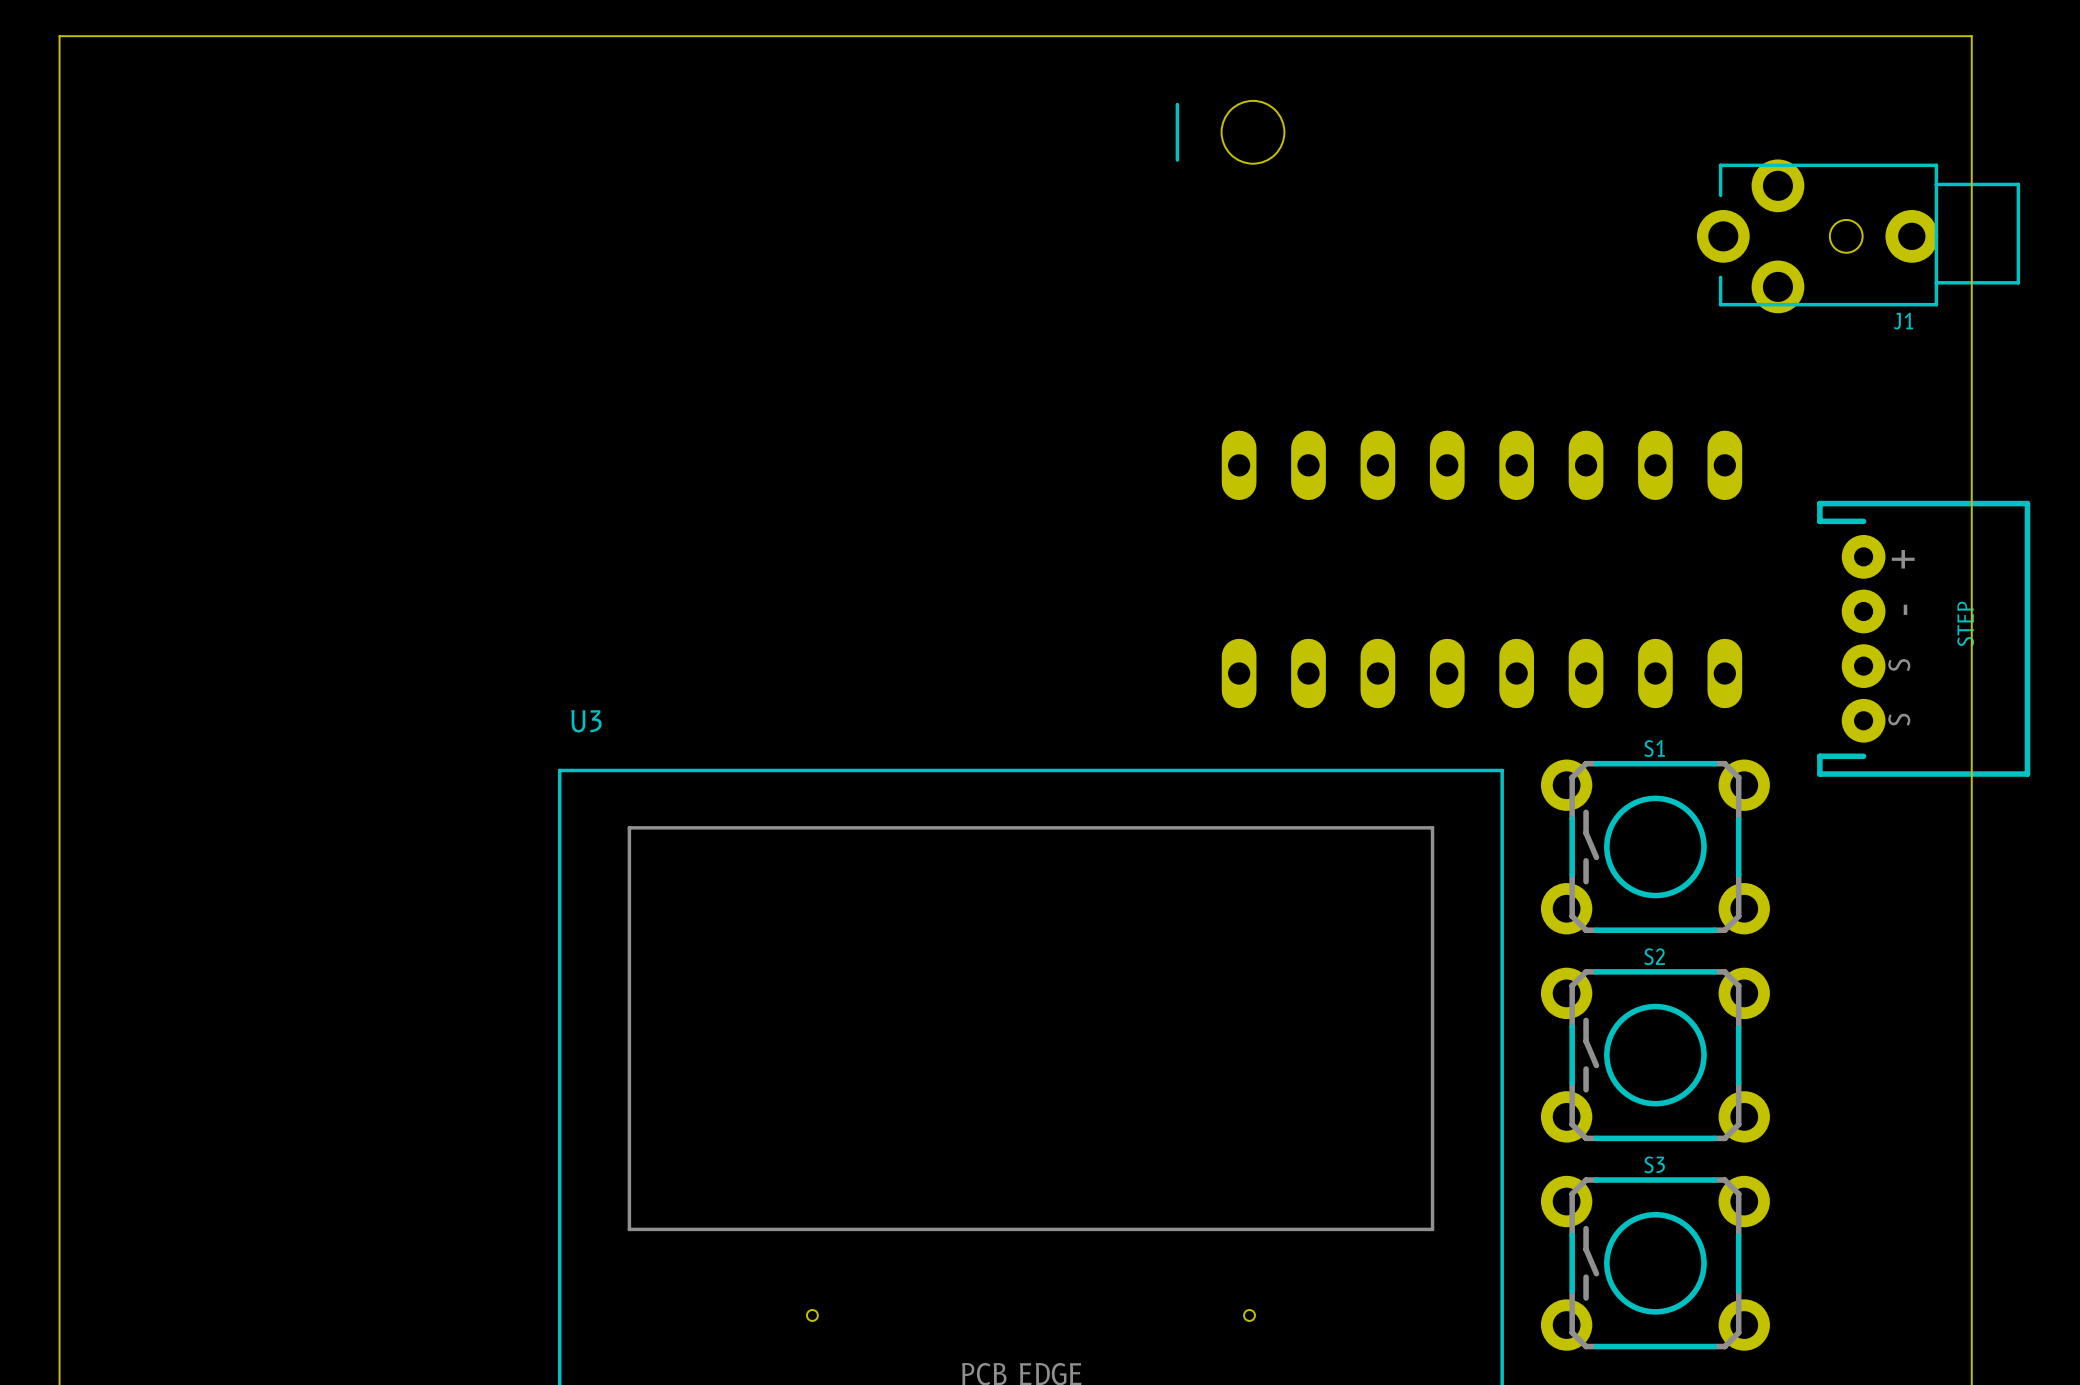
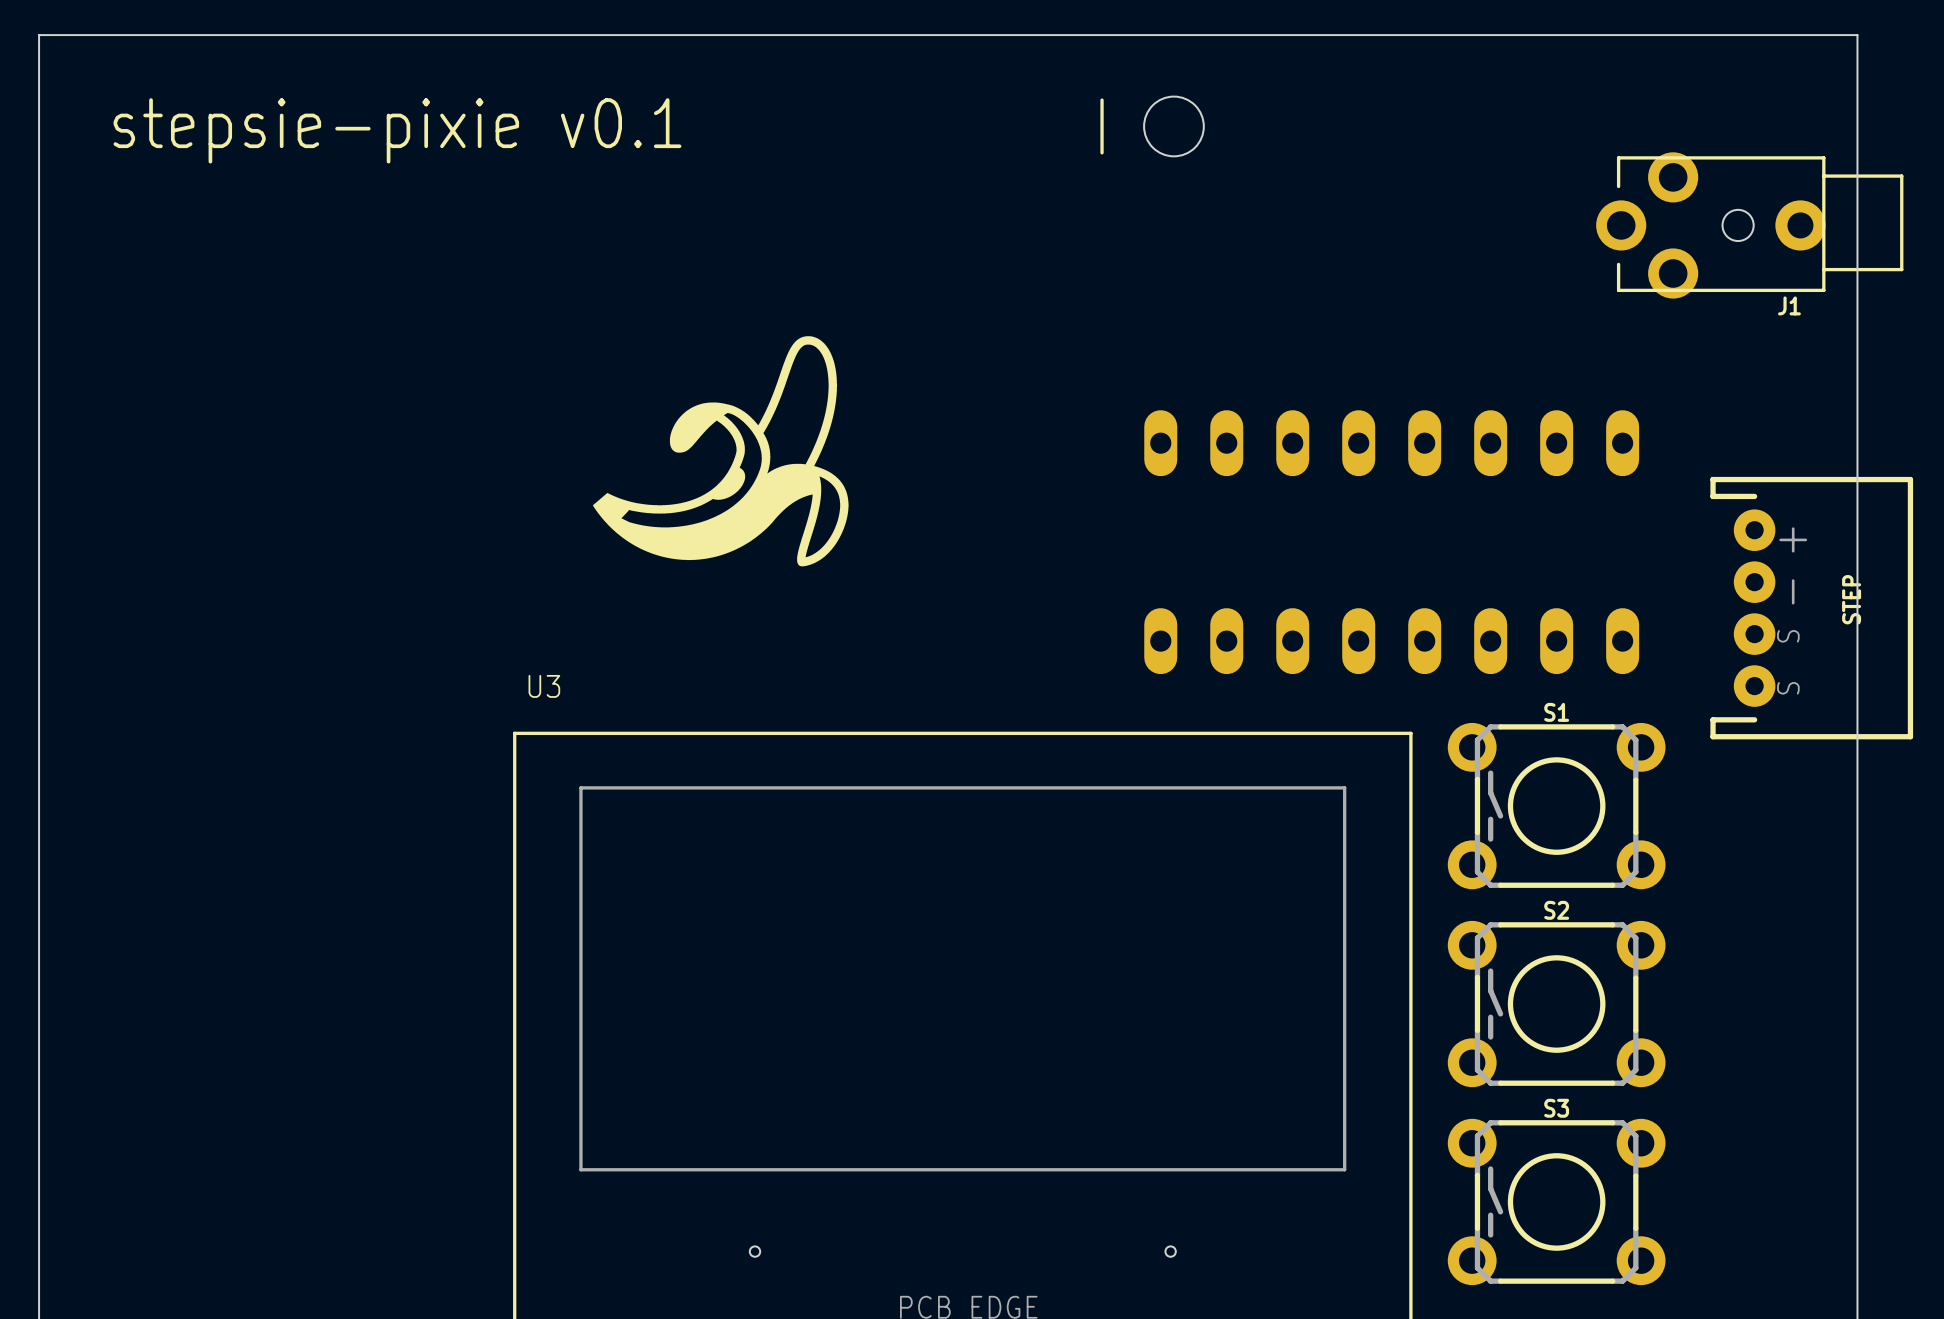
text: none -> stepsie-pixie v0.1 (397, 130)
drawing: none -> [592, 336, 849, 567]

